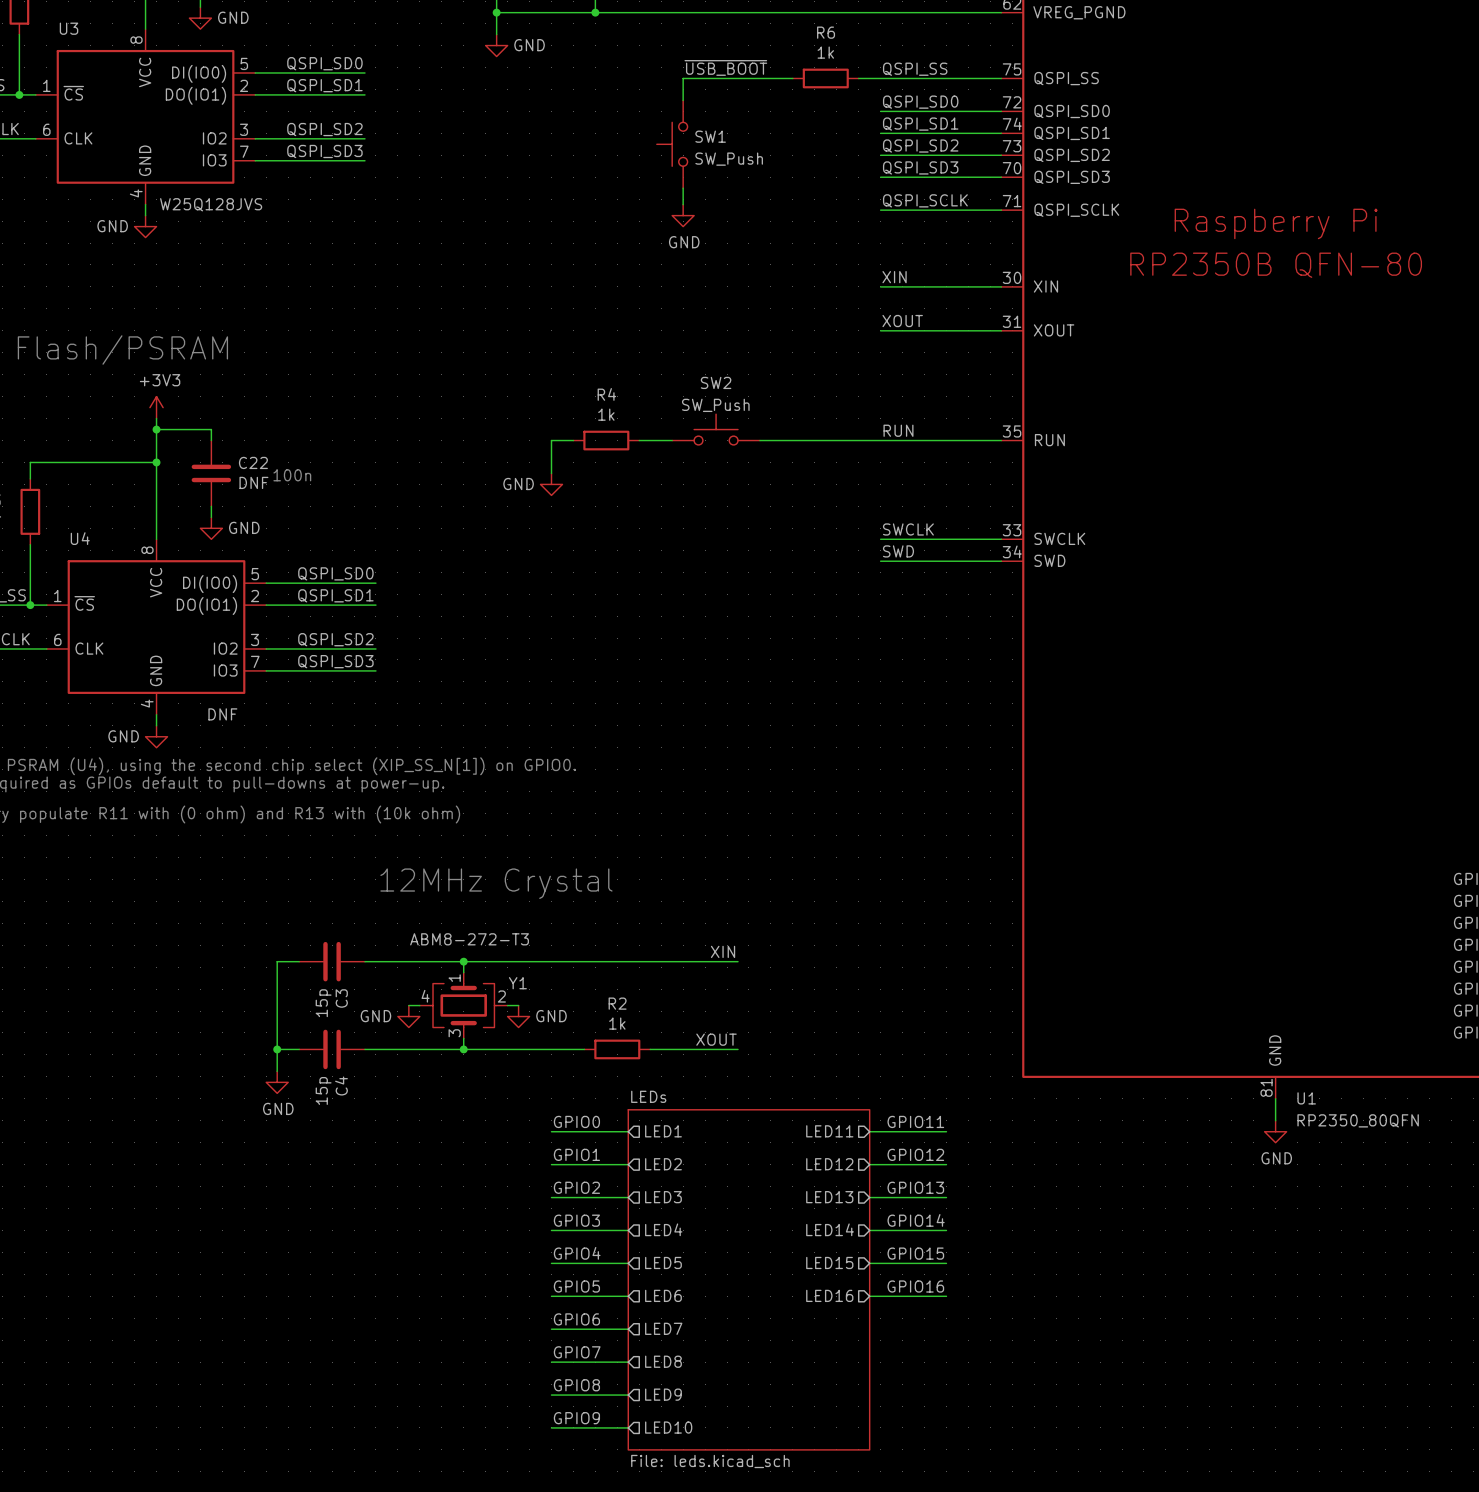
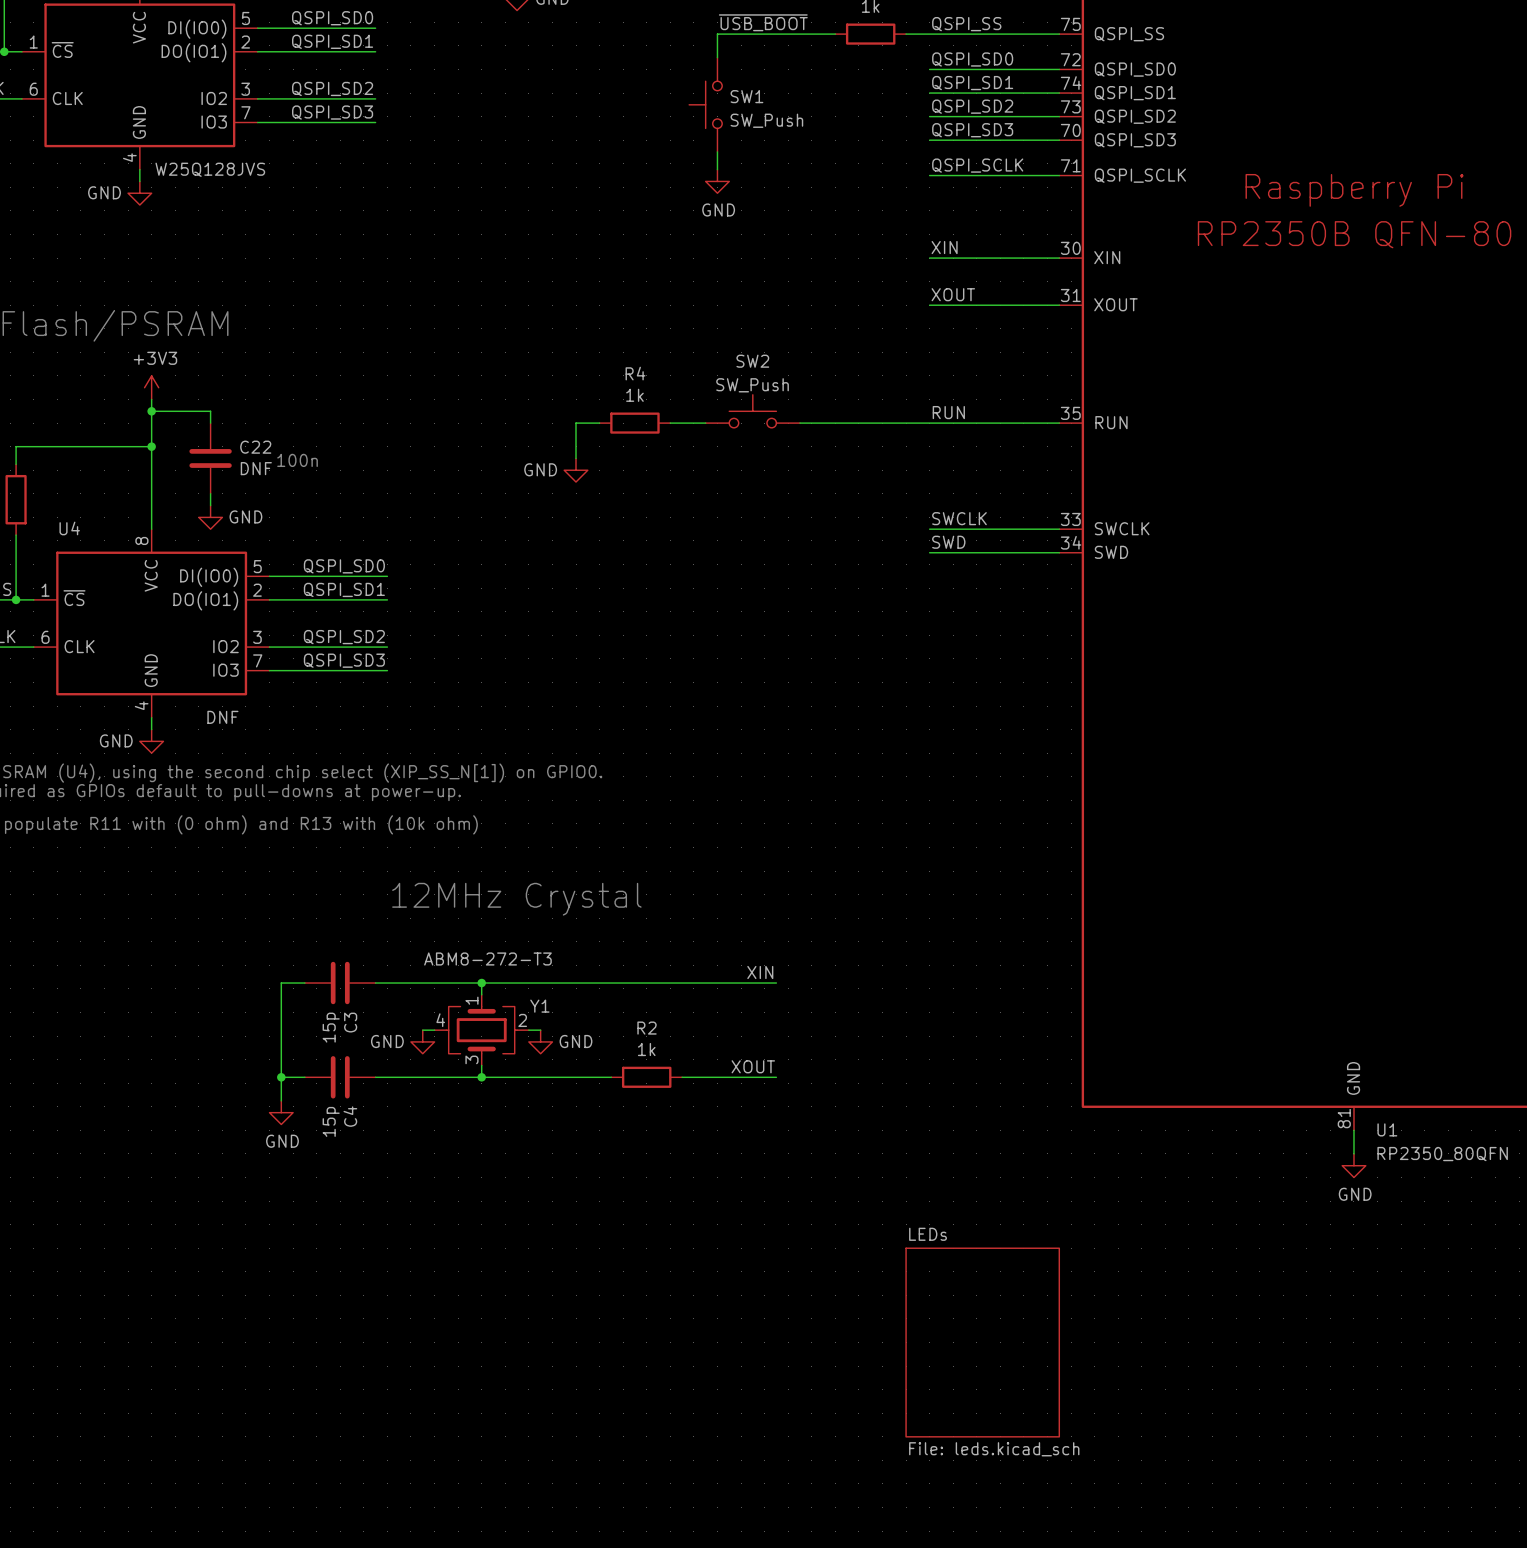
label: GPIO0 (576, 1121) -> none
label: GPIO11 (915, 1121) -> none
wire: (551, 1131) (628, 1131) -> none
hierarchical label: LED1 (663, 1131) -> none
hierarchical label: LED11 (829, 1131) -> none
wire: (869, 1131) (946, 1131) -> none
label: GPIO1 (576, 1154) -> none
label: GPIO12 (915, 1154) -> none
wire: (551, 1164) (628, 1164) -> none
hierarchical label: LED2 (663, 1164) -> none
hierarchical label: LED12 (829, 1164) -> none
wire: (869, 1164) (946, 1164) -> none
label: GPIO2 (576, 1187) -> none
label: GPIO13 (915, 1187) -> none
wire: (551, 1197) (628, 1197) -> none
hierarchical label: LED3 (663, 1197) -> none
hierarchical label: LED13 (829, 1197) -> none
wire: (869, 1197) (946, 1197) -> none
label: GPIO3 (576, 1220) -> none
label: GPIO14 (916, 1220) -> none
hierarchical label: LED4 (663, 1229) -> none
hierarchical label: LED14 (830, 1229) -> none
wire: (551, 1230) (628, 1230) -> none
wire: (869, 1230) (946, 1230) -> none
label: GPIO4 (577, 1253) -> none
label: GPIO15 (915, 1253) -> none
hierarchical label: LED5 (663, 1262) -> none
hierarchical label: LED15 (829, 1262) -> none
wire: (551, 1263) (628, 1263) -> none
wire: (869, 1263) (946, 1263) -> none
sheet LEDs: File: leds.kicad_sch (748, 1279) -> none
label: GPIO5 (576, 1286) -> none
label: GPIO16 (915, 1286) -> none
hierarchical label: LED6 (663, 1295) -> none
hierarchical label: LED16 (829, 1295) -> none
wire: (551, 1296) (628, 1296) -> none
wire: (869, 1296) (946, 1296) -> none
sheet LEDs: none -> File: leds.kicad_sch (982, 1342)
label: GPIO6 (576, 1319) -> none
hierarchical label: LED7 (663, 1328) -> none
wire: (551, 1329) (628, 1329) -> none
label: GPIO7 (577, 1352) -> none
hierarchical label: LED8 (663, 1361) -> none
wire: (551, 1362) (628, 1362) -> none
label: GPIO8 (576, 1385) -> none
hierarchical label: LED9 (663, 1394) -> none
wire: (551, 1395) (628, 1395) -> none
label: GPIO9 (576, 1418) -> none
wire: (551, 1427) (628, 1427) -> none
hierarchical label: LED10 (668, 1427) -> none

